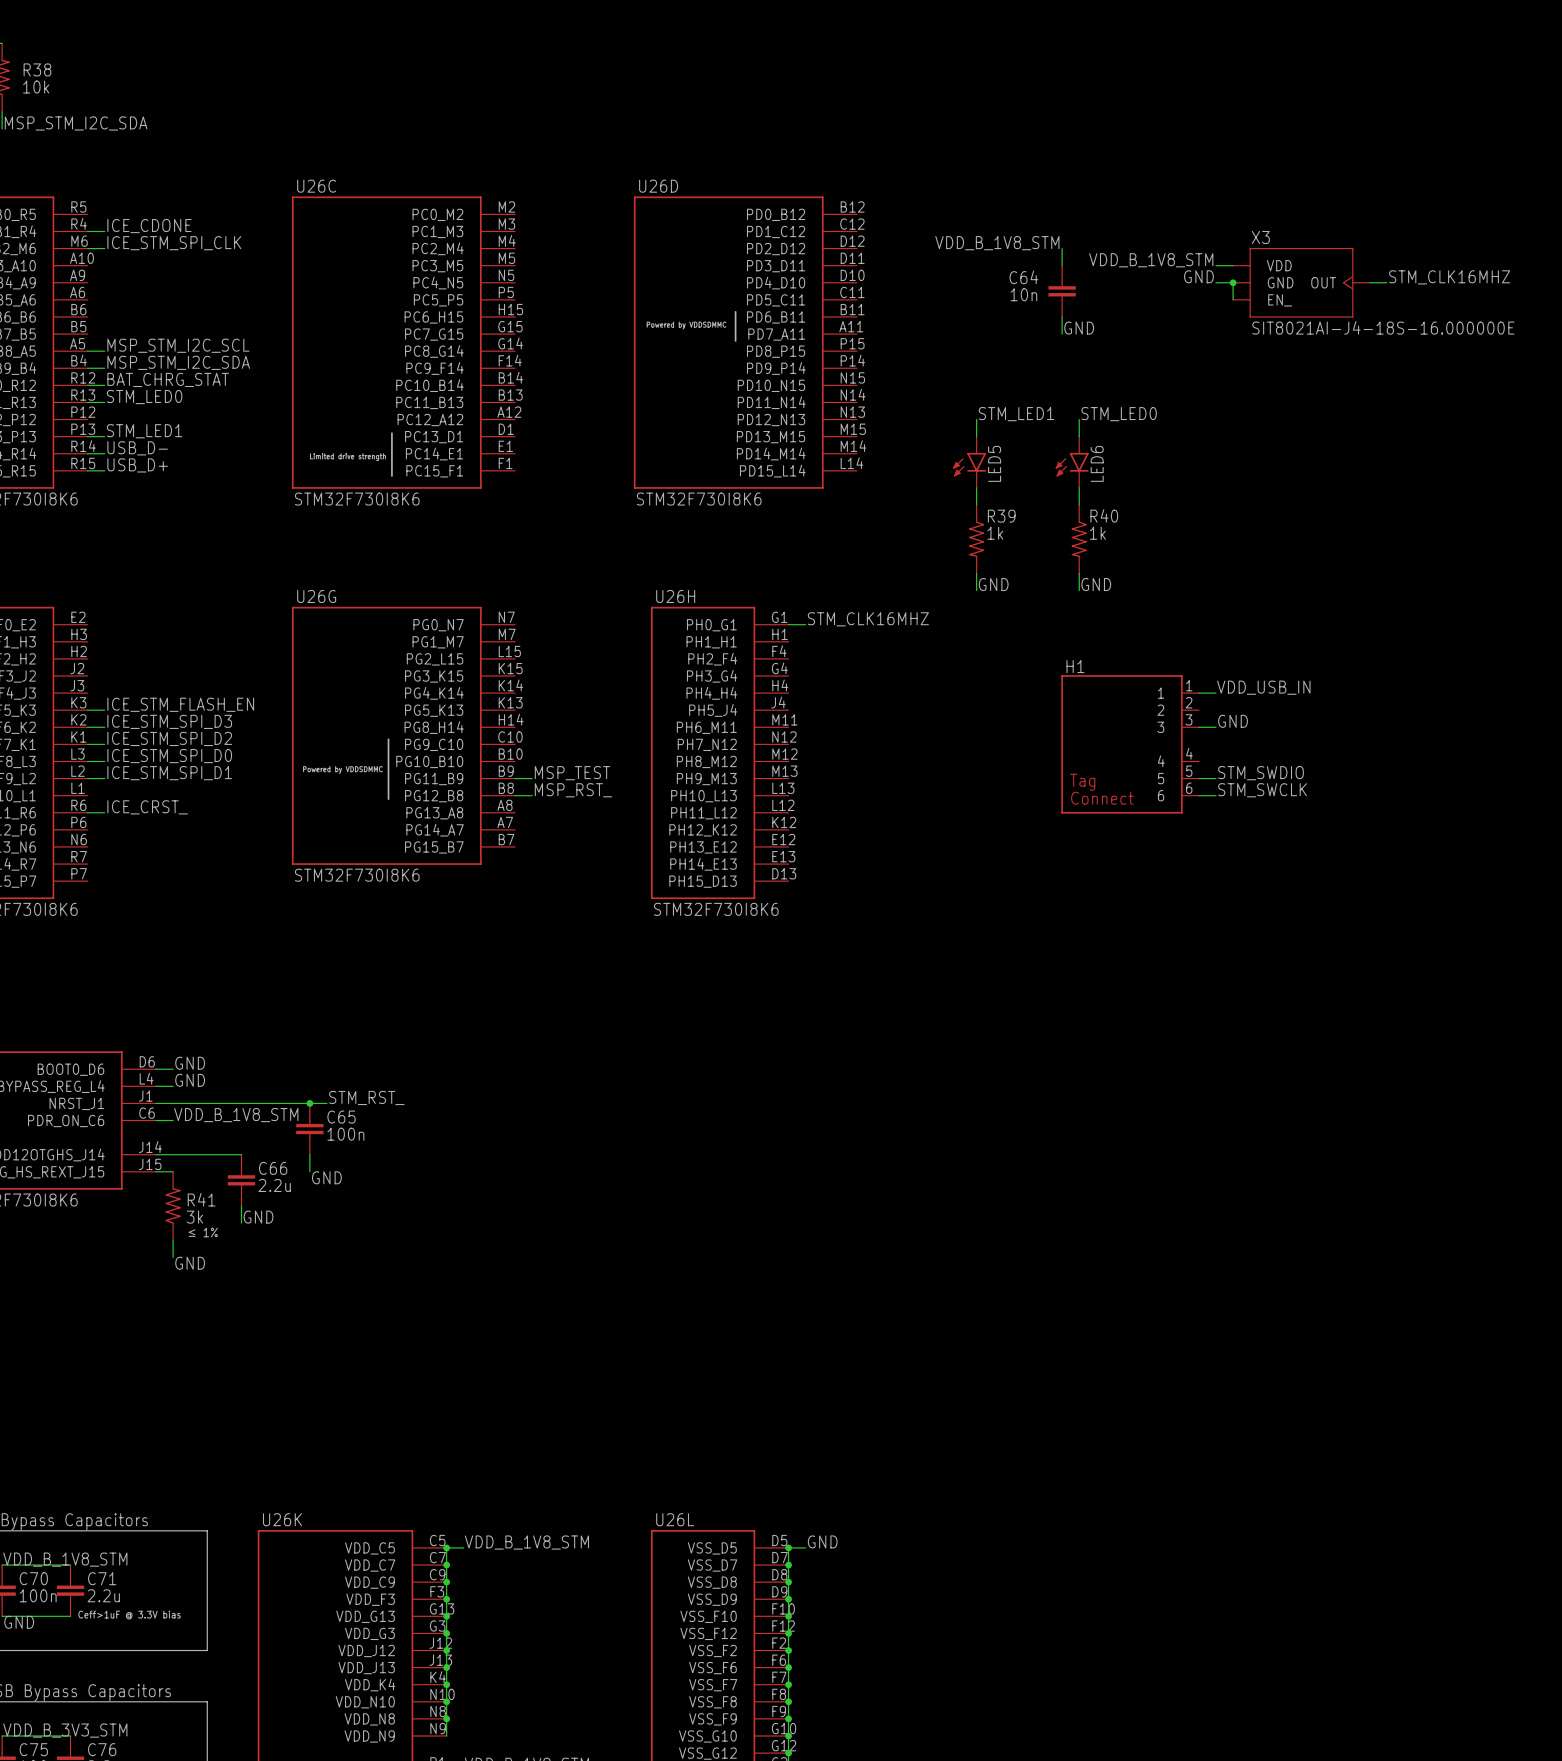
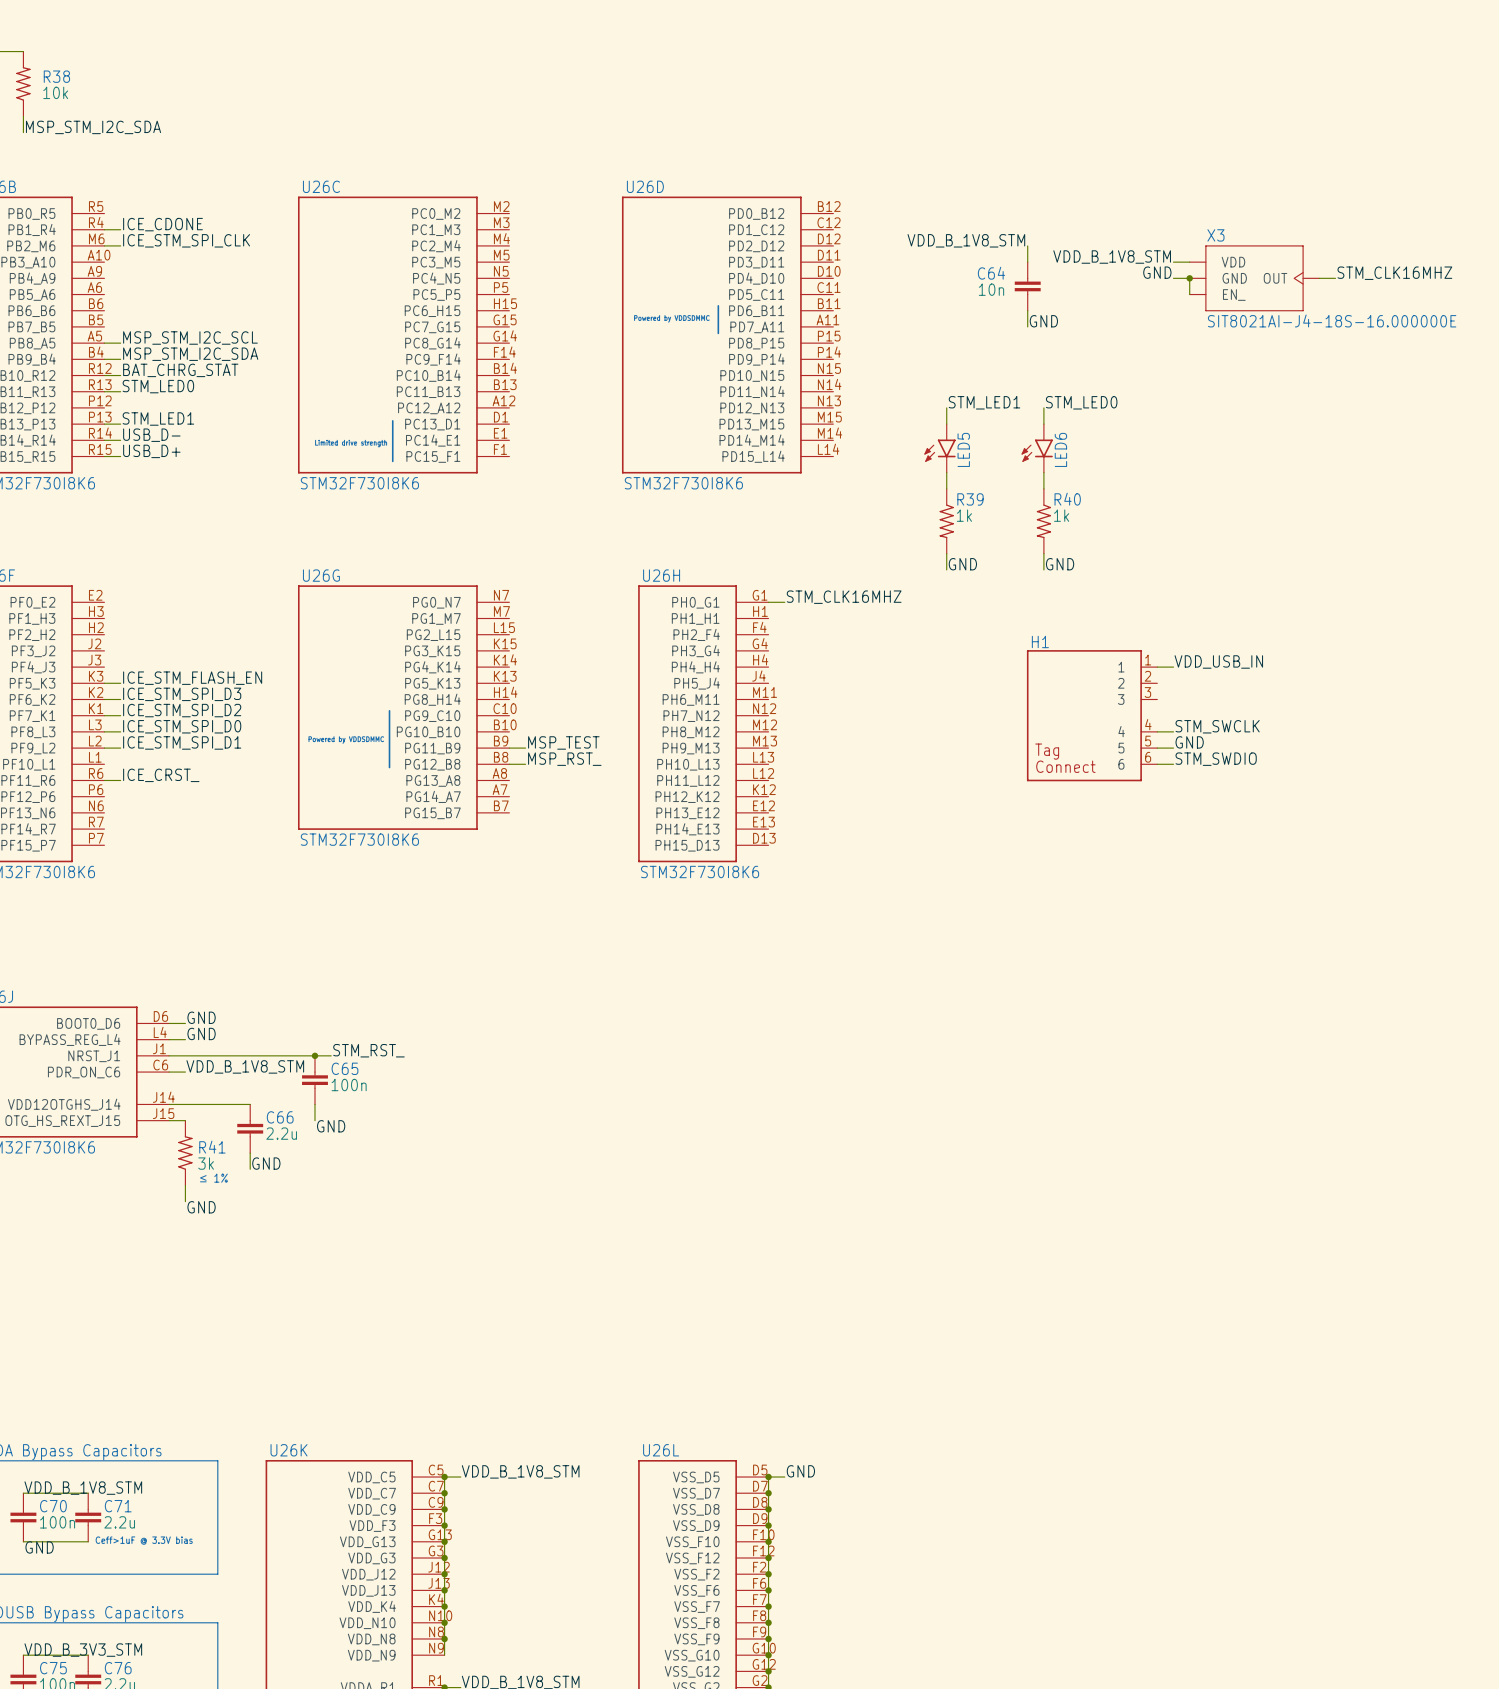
label: GND (1233, 721) -> none
wire: (1198, 727) (1215, 727) -> (1157, 731) (1173, 731)
label: none -> STM_SWCLK (1217, 726)
label: STM_SWDIO (1260, 773) -> GND (1189, 742)
label: STM_SWCLK (1262, 790) -> STM_SWDIO (1216, 759)

